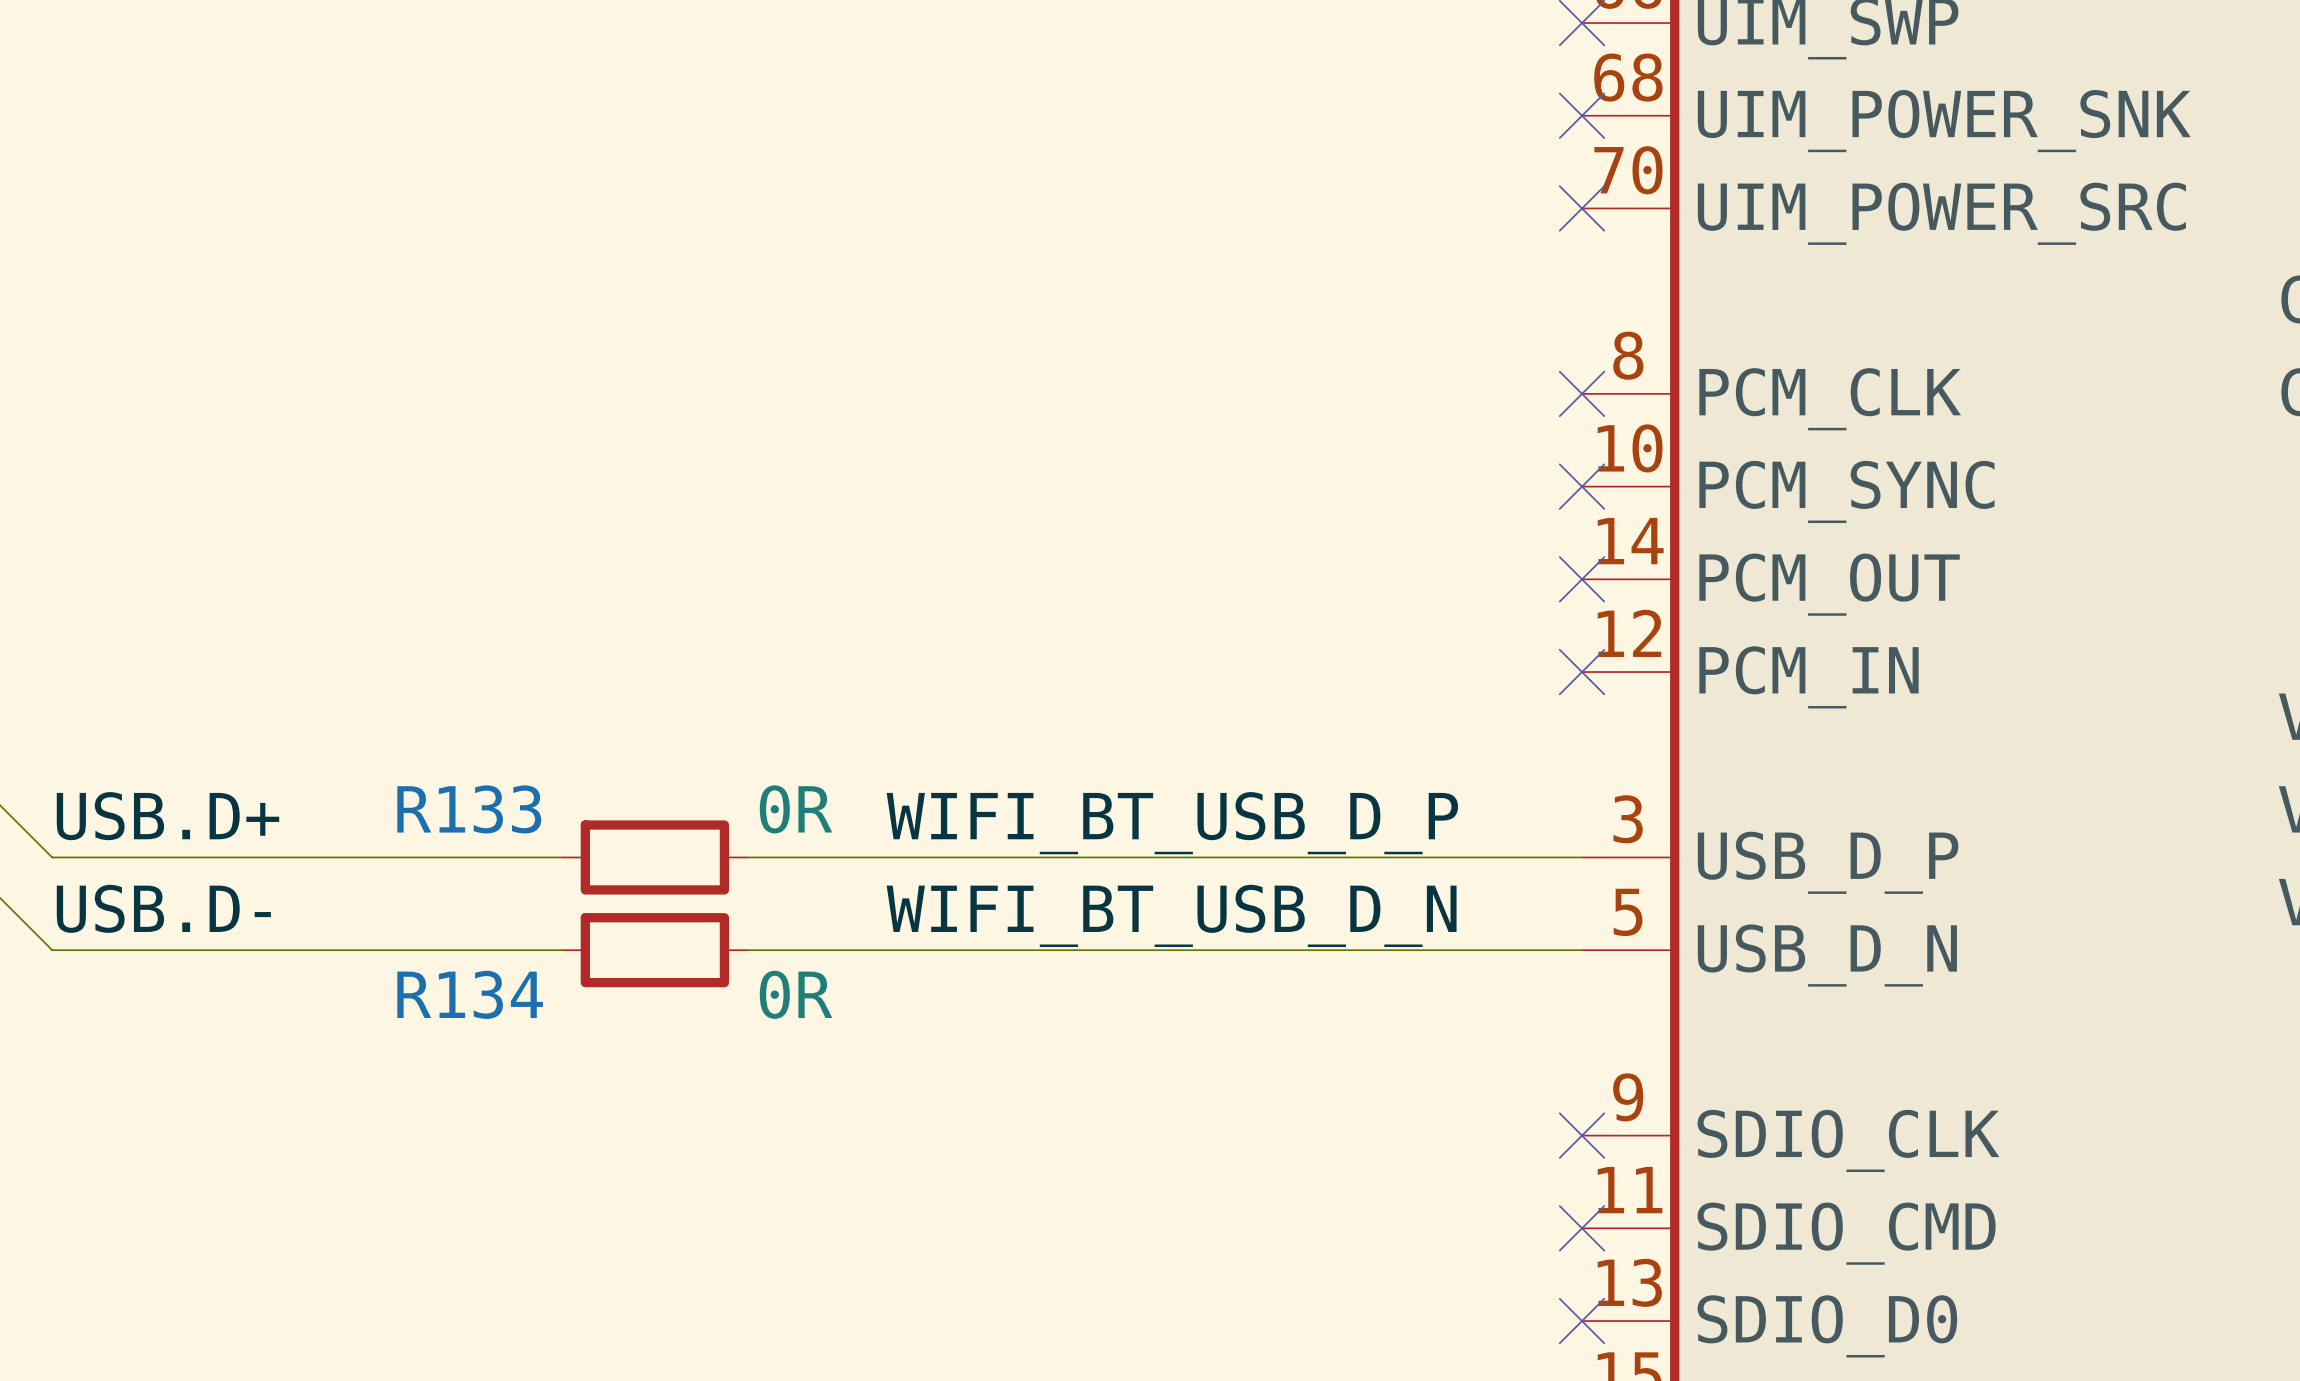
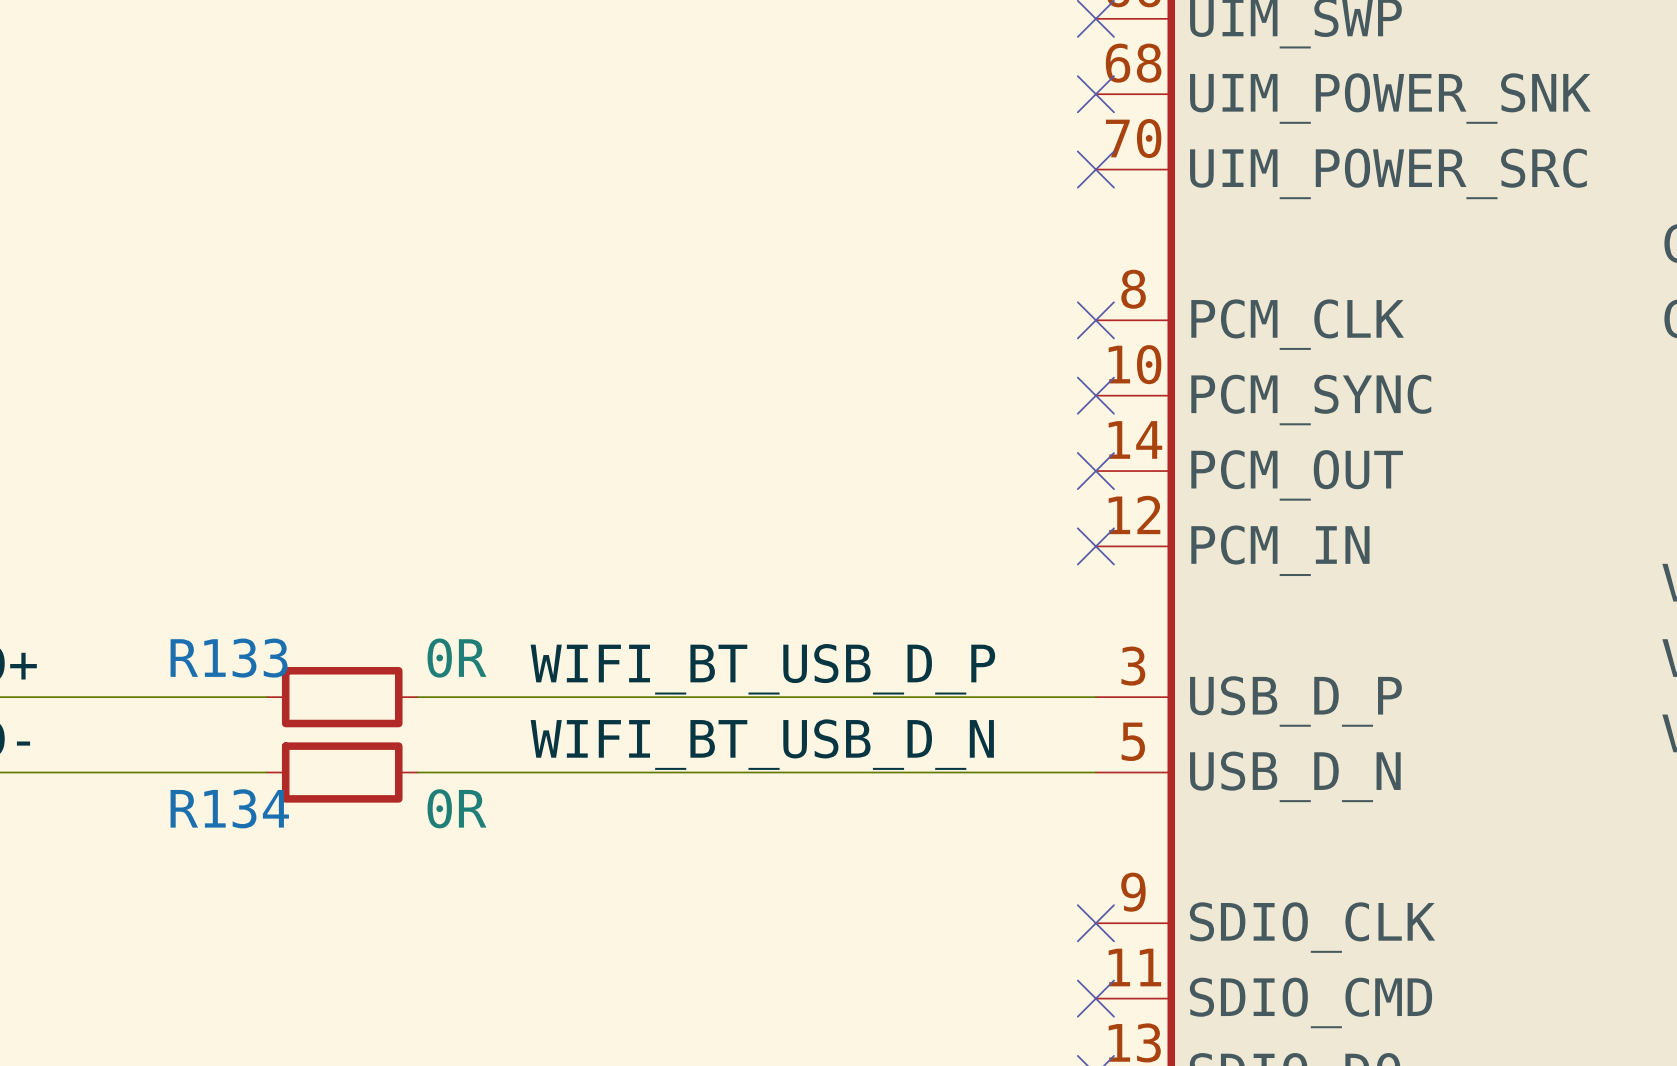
R133 name position: R133 (469, 809) -> R133 (229, 658)
R134 name position: R134 (470, 994) -> R134 (229, 808)

